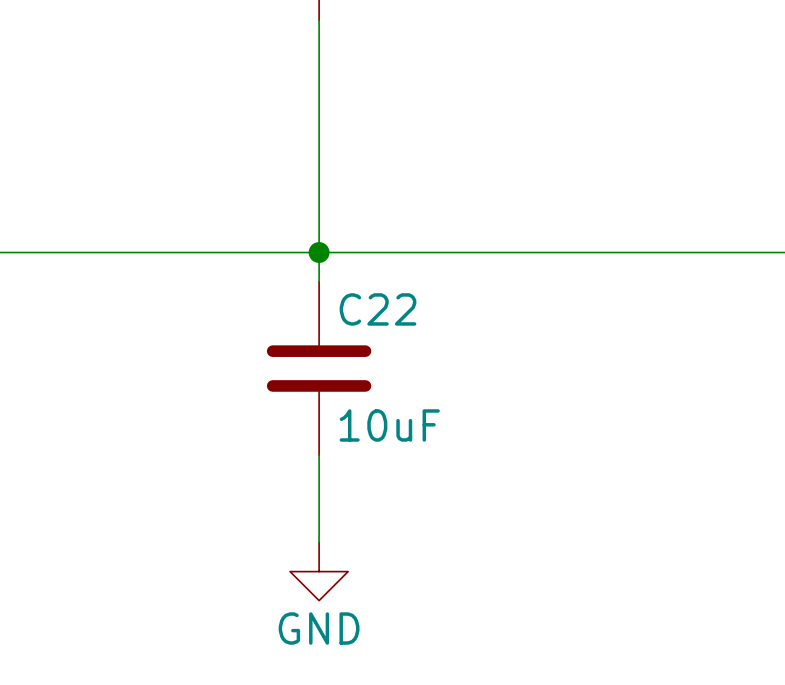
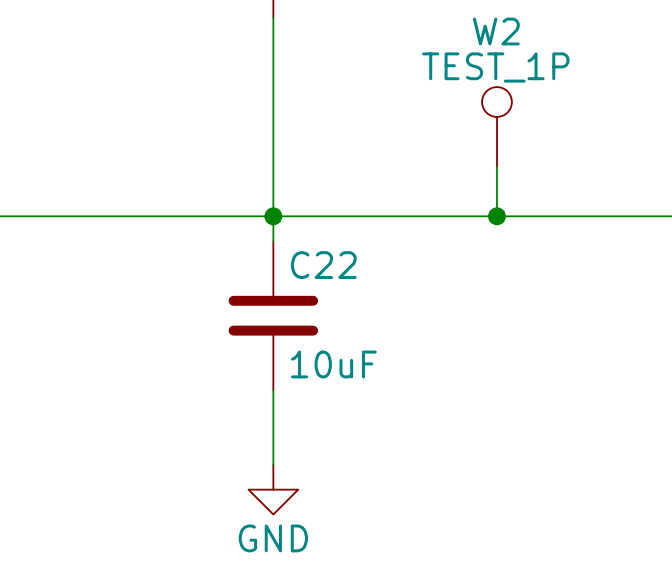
W2: none -> TEST_1P (496, 126)
wire: none -> (496, 166) (496, 216)
junction: none -> (496, 216)

